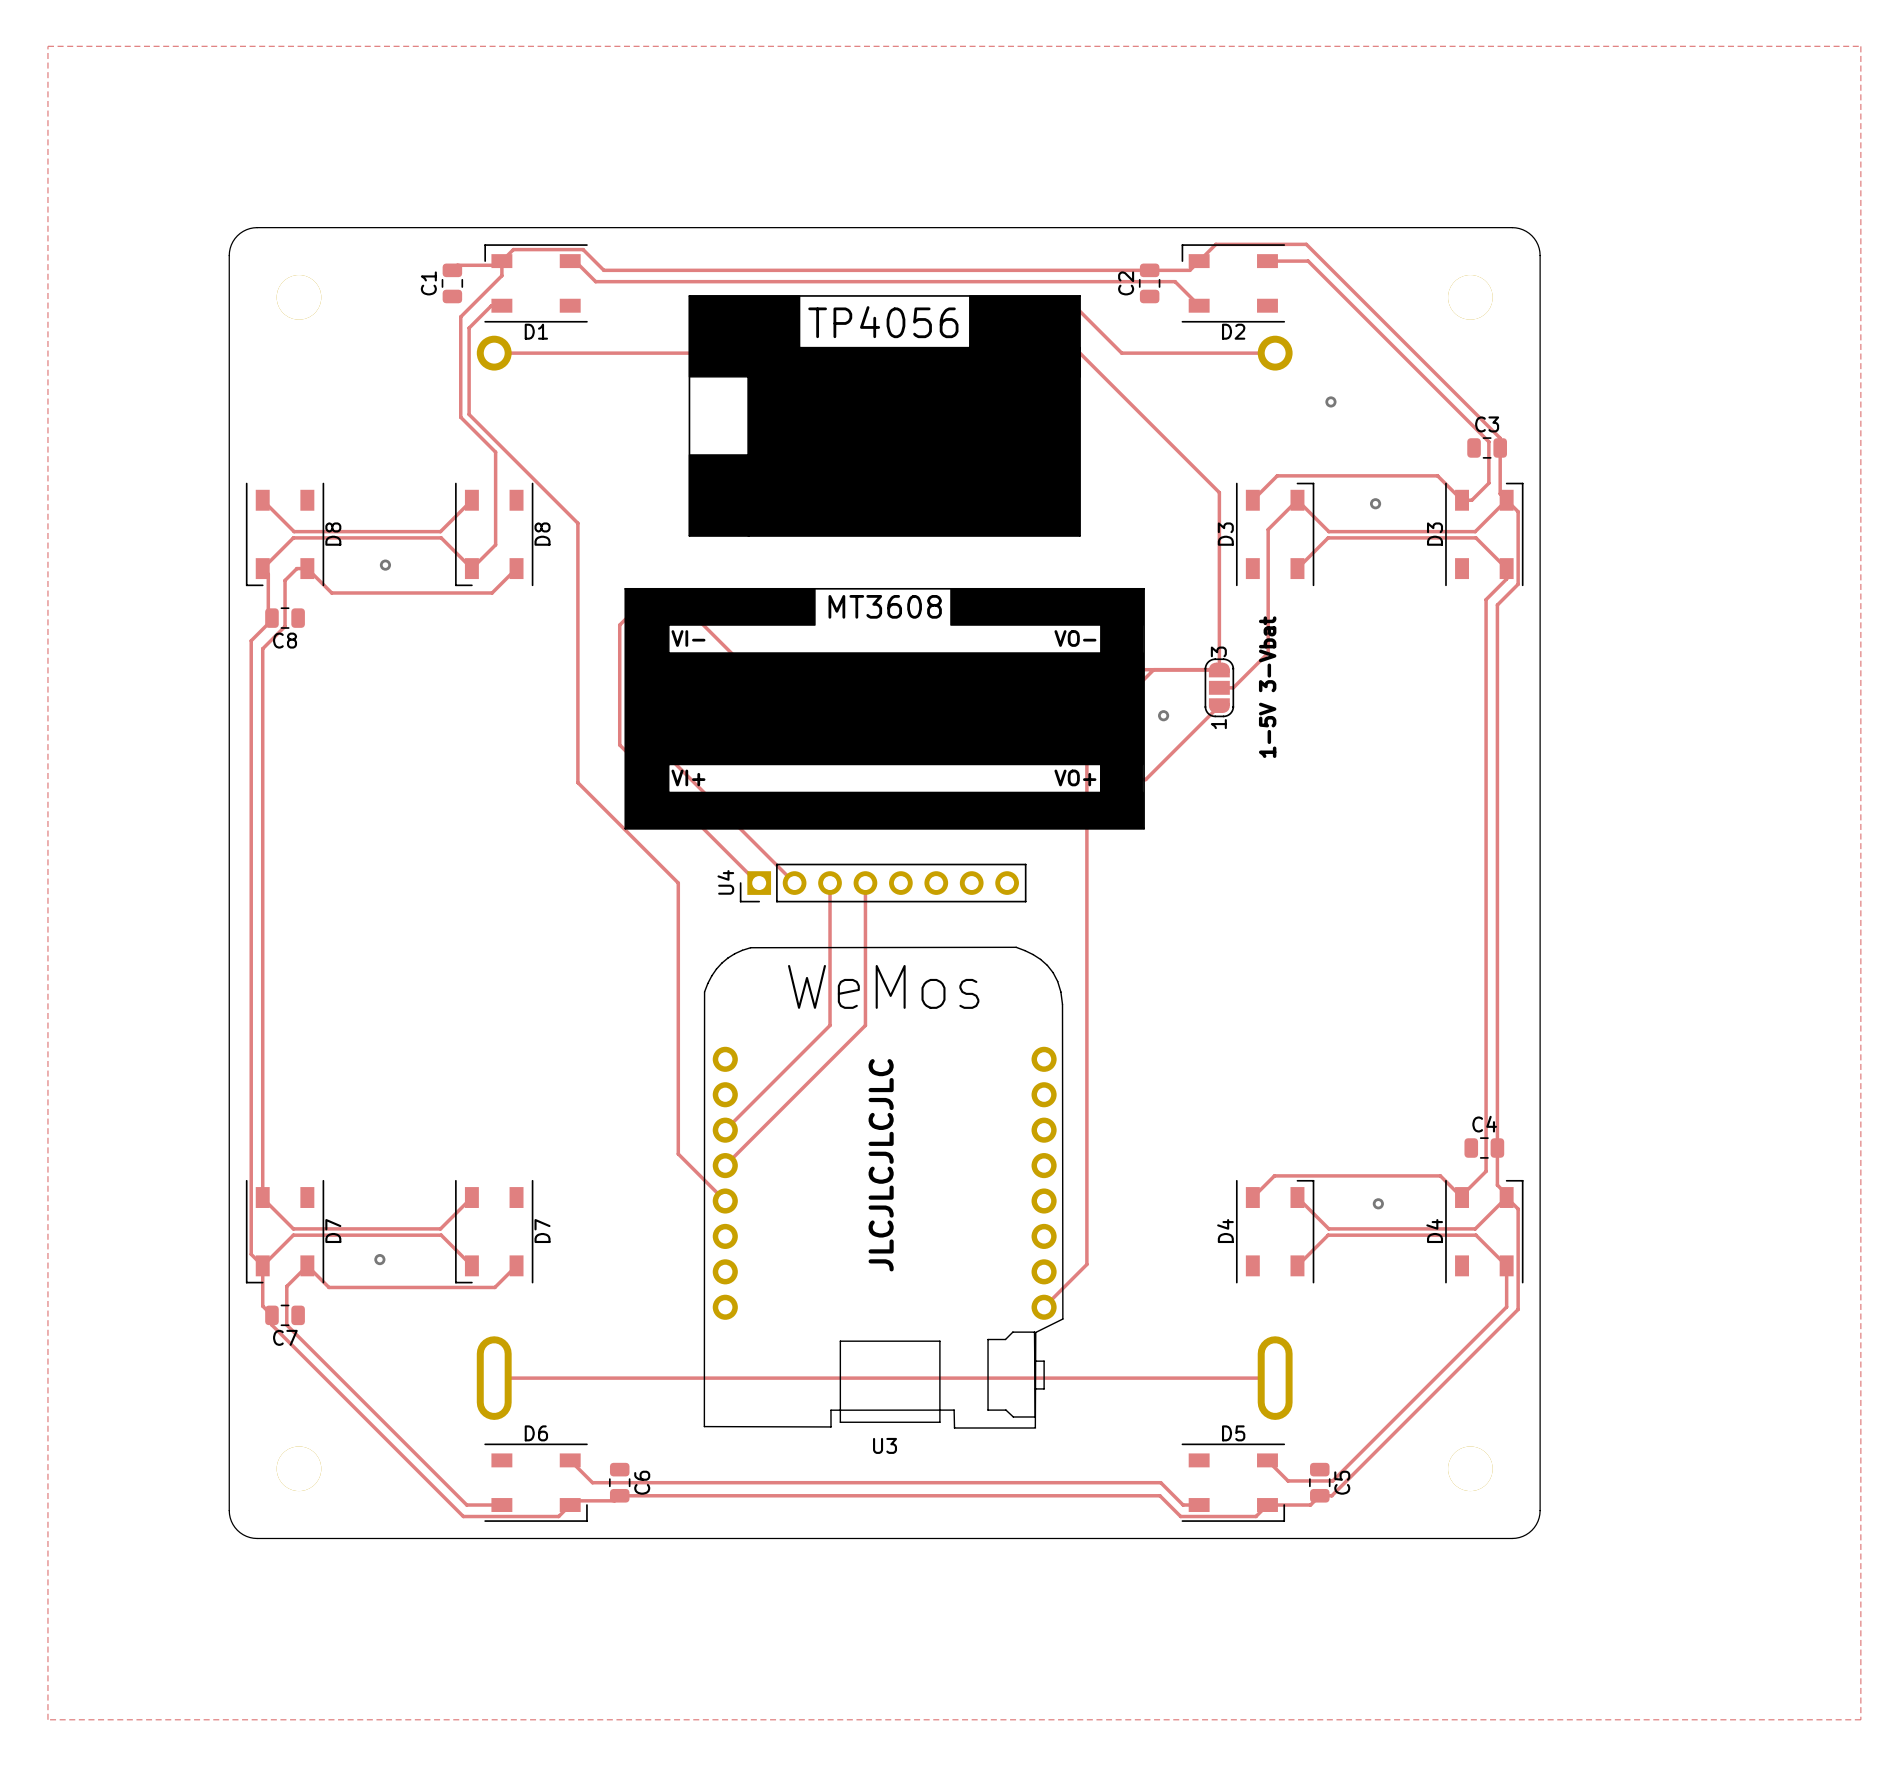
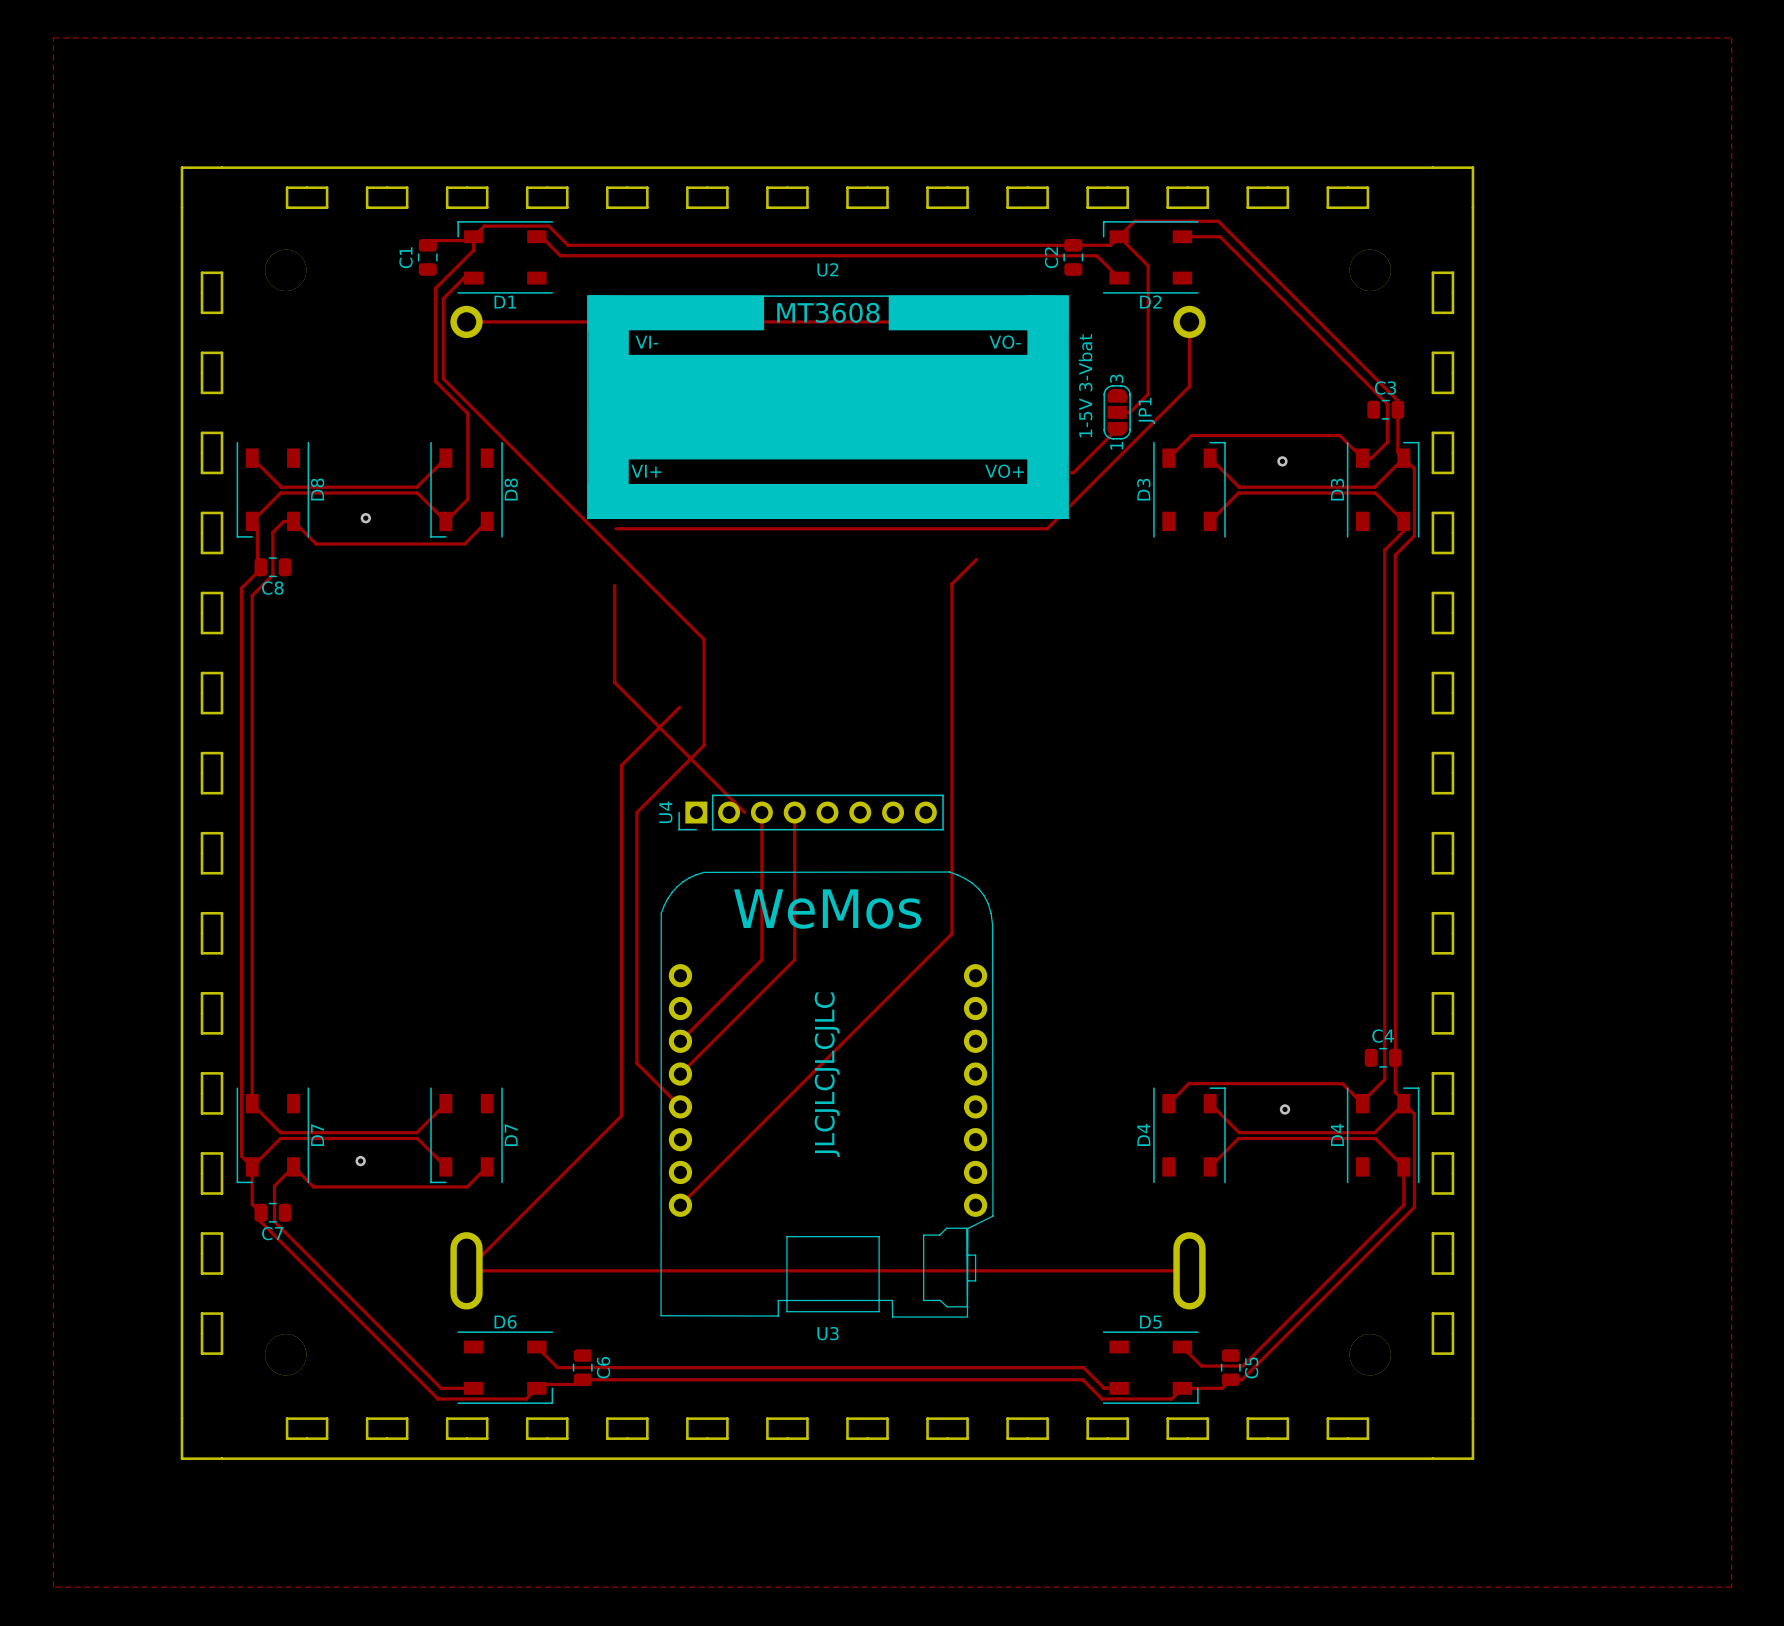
board edge: none -> (287, 187) (327, 187) (327, 207) (287, 207) (287, 187)
board edge: none -> (367, 187) (407, 187) (407, 207) (367, 207) (367, 187)
board edge: none -> (447, 187) (487, 187) (487, 207) (447, 207) (447, 187)
board edge: none -> (527, 187) (567, 187) (567, 207) (527, 207) (527, 187)
board edge: none -> (607, 187) (647, 187) (647, 207) (607, 207) (607, 187)
board edge: none -> (687, 187) (727, 187) (727, 207) (687, 207) (687, 187)
board edge: none -> (767, 187) (807, 187) (807, 207) (767, 207) (767, 187)
board edge: none -> (847, 187) (887, 187) (887, 207) (847, 207) (847, 187)
board edge: none -> (927, 187) (967, 187) (967, 207) (927, 207) (927, 187)
board edge: none -> (1007, 187) (1047, 187) (1047, 207) (1007, 207) (1007, 187)
board edge: none -> (1087, 187) (1127, 187) (1127, 207) (1087, 207) (1087, 187)
board edge: none -> (1167, 187) (1207, 187) (1207, 207) (1167, 207) (1167, 187)
board edge: none -> (1247, 187) (1287, 187) (1287, 207) (1247, 207) (1247, 187)
board edge: none -> (1327, 187) (1367, 187) (1367, 207) (1327, 207) (1327, 187)
board edge: (257, 227) (1512, 227) (1522, 229) (1531, 235) (1537, 244) (1540, 255) (1540, 1510) (1537, 1521) (1531, 1530) (1522, 1536) (1512, 1538) (257, 1538) (246, 1536) (237, 1530) (231, 1521) (229, 1510) (229, 255) (231, 244) (237, 235) (246, 229) (257, 227) -> (181, 167) (181, 1458) (1472, 1458) (1472, 167) (181, 167)
track: none -> (1119, 236) (1148, 265) (1148, 394) (1130, 412) (1117, 412)
board edge: none -> (202, 272) (202, 312) (222, 312) (222, 272) (202, 272)
board edge: none -> (1432, 272) (1432, 312) (1452, 312) (1452, 272) (1432, 272)
track: (1045, 318) (1219, 492) (1219, 669) (748, 669) (682, 604) (640, 604) (619, 625) (619, 745) (759, 883) -> none
track: (1275, 353) (1121, 353) (1065, 297) (1031, 297) (975, 353) (1045, 422) (1045, 478) -> (1189, 321) (1189, 386) (1047, 528) (616, 528)
board edge: none -> (202, 352) (202, 392) (222, 392) (222, 352) (202, 352)
board edge: none -> (1432, 352) (1432, 392) (1452, 392) (1452, 352) (1432, 352)
via: (1330, 401) -> none
part: (884, 415) -> none
U2: none -> (828, 407)
JP1: none -> (1117, 412)
track: none -> (1117, 429) (1073, 472) (1041, 472)
board edge: none -> (202, 432) (222, 432) (222, 472) (202, 472) (202, 432)
board edge: none -> (1432, 432) (1452, 432) (1452, 472) (1432, 472) (1432, 432)
track: (1297, 500) (1268, 529) (1268, 652) (1233, 687) (1219, 687) -> none
track: (577, 523) (577, 782) (678, 883) -> (543, 479) (704, 639) (704, 745) (636, 812)
board edge: none -> (202, 512) (202, 552) (222, 552) (222, 512) (202, 512)
board edge: none -> (1432, 512) (1432, 552) (1452, 552) (1452, 512) (1432, 512)
track: none -> (976, 559) (951, 584) (951, 933) (680, 1205)
board edge: none -> (202, 593) (202, 633) (222, 633) (222, 593) (202, 593)
board edge: none -> (1432, 593) (1432, 633) (1452, 633) (1452, 593) (1432, 593)
track: (1153, 669) (1086, 736) (1086, 1264) (1044, 1307) -> none
part: (1219, 687) -> none
text position: 1-5V 3-Vbat (1267, 687) -> 1-5V 3-Vbat (1085, 385)
track: (1219, 705) (1145, 779) (1114, 779) -> none
part: (884, 708) -> none
via: (1163, 715) -> none
board edge: none -> (202, 673) (202, 713) (222, 713) (222, 673) (202, 673)
board edge: none -> (1432, 673) (1432, 713) (1452, 713) (1452, 673) (1432, 673)
track: none -> (679, 707) (621, 765) (621, 1115) (466, 1270)
board edge: none -> (202, 753) (202, 793) (222, 793) (222, 753) (202, 753)
board edge: none -> (1432, 753) (1432, 793) (1452, 793) (1452, 753) (1432, 753)
track: (830, 883) (830, 1025) (813, 1042) -> (761, 812) (761, 959)
track: (865, 883) (865, 1025) (848, 1042) -> (794, 812) (794, 959)
U4 position: (883, 883) -> (811, 812)
board edge: none -> (202, 833) (202, 873) (222, 873) (222, 833) (202, 833)
board edge: none -> (1432, 833) (1432, 873) (1452, 873) (1452, 833) (1432, 833)
board edge: none -> (202, 913) (202, 953) (222, 953) (222, 913) (202, 913)
board edge: none -> (1432, 913) (1432, 953) (1452, 953) (1452, 913) (1432, 913)
board edge: none -> (202, 993) (202, 1033) (222, 1033) (222, 993) (202, 993)
board edge: none -> (1432, 993) (1432, 1033) (1452, 1033) (1452, 993) (1432, 993)
board edge: none -> (202, 1073) (202, 1113) (222, 1113) (222, 1073) (202, 1073)
board edge: none -> (1432, 1073) (1432, 1113) (1452, 1113) (1452, 1073) (1432, 1073)
board edge: none -> (202, 1153) (202, 1193) (222, 1193) (222, 1153) (202, 1153)
board edge: none -> (1432, 1153) (1432, 1193) (1452, 1193) (1452, 1153) (1432, 1153)
board edge: none -> (202, 1233) (222, 1233) (222, 1273) (202, 1273) (202, 1233)
board edge: none -> (1432, 1233) (1432, 1273) (1452, 1273) (1452, 1233) (1432, 1233)
board edge: none -> (202, 1313) (202, 1353) (222, 1353) (222, 1313) (202, 1313)
board edge: none -> (1432, 1313) (1432, 1353) (1452, 1353) (1452, 1313) (1432, 1313)
board edge: none -> (287, 1418) (327, 1418) (327, 1438) (287, 1438) (287, 1418)
board edge: none -> (367, 1418) (407, 1418) (407, 1438) (367, 1438) (367, 1418)
board edge: none -> (447, 1418) (487, 1418) (487, 1438) (447, 1438) (447, 1418)
board edge: none -> (527, 1418) (567, 1418) (567, 1438) (527, 1438) (527, 1418)
board edge: none -> (607, 1418) (647, 1418) (647, 1438) (607, 1438) (607, 1418)
board edge: none -> (687, 1418) (727, 1418) (727, 1438) (687, 1438) (687, 1418)
board edge: none -> (767, 1418) (807, 1418) (807, 1438) (767, 1438) (767, 1418)
board edge: none -> (847, 1418) (887, 1418) (887, 1438) (847, 1438) (847, 1418)
board edge: none -> (927, 1418) (967, 1418) (967, 1438) (927, 1438) (927, 1418)
board edge: none -> (1007, 1418) (1047, 1418) (1047, 1438) (1007, 1438) (1007, 1418)
board edge: none -> (1087, 1418) (1127, 1418) (1127, 1438) (1087, 1438) (1087, 1418)
board edge: none -> (1167, 1418) (1207, 1418) (1207, 1438) (1167, 1438) (1167, 1418)
board edge: none -> (1247, 1418) (1287, 1418) (1287, 1438) (1247, 1438) (1247, 1418)
board edge: none -> (1327, 1418) (1367, 1418) (1367, 1438) (1327, 1438) (1327, 1418)

